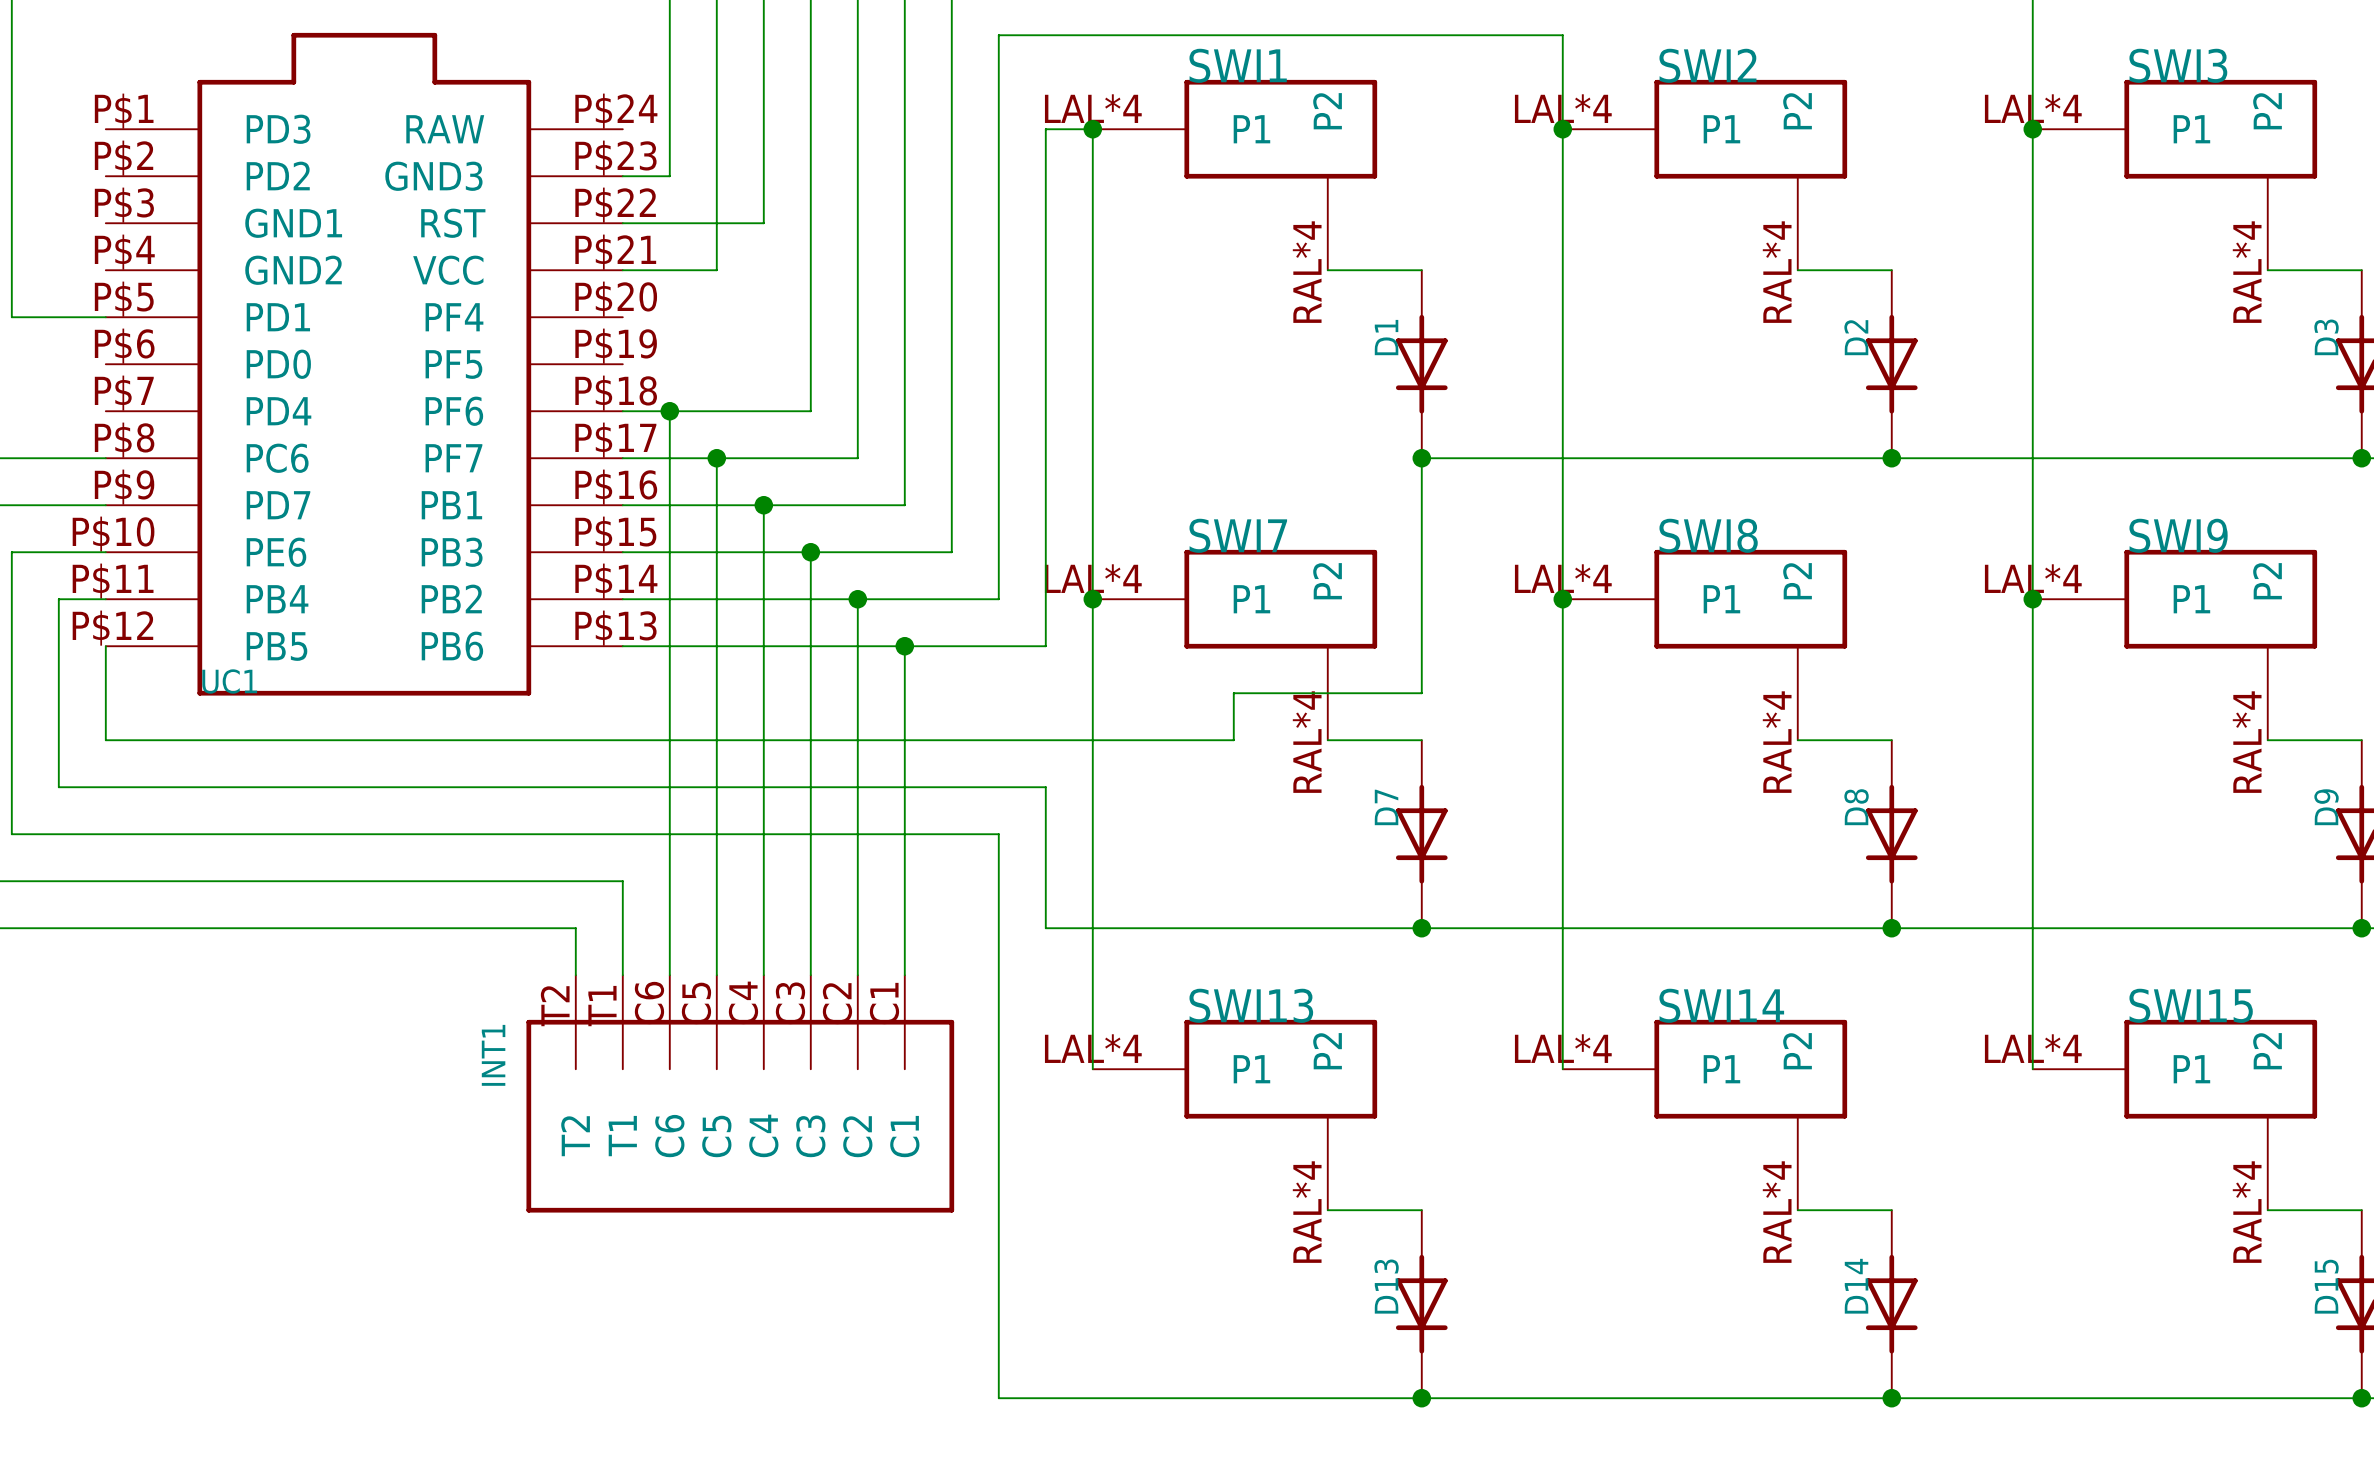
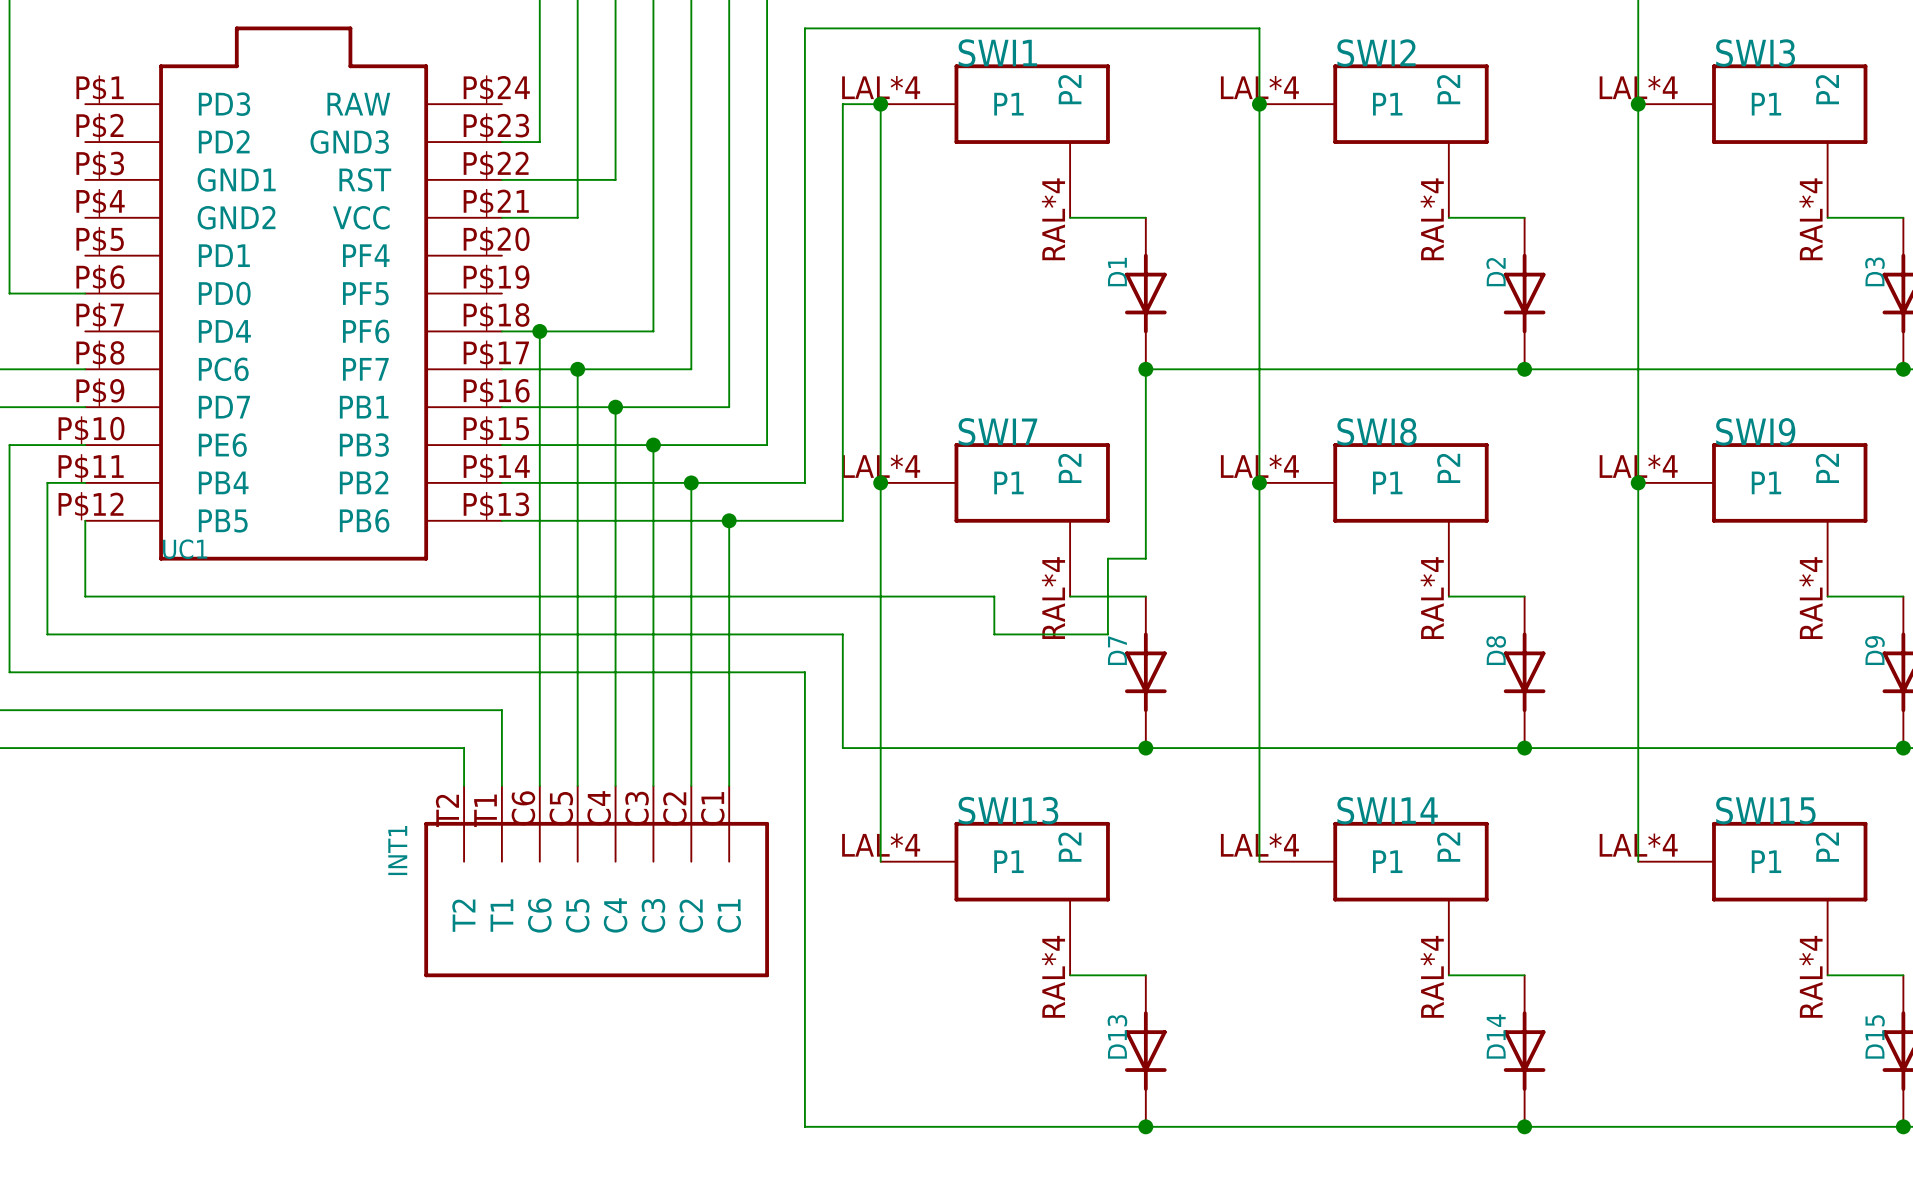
wire: (11, 317) (105, 317) -> (9, 255) (9, 293) (85, 293)
wire: (1374, 693) (1233, 693) (1233, 740) -> (1107, 558) (1107, 634) (994, 634) (994, 596)

